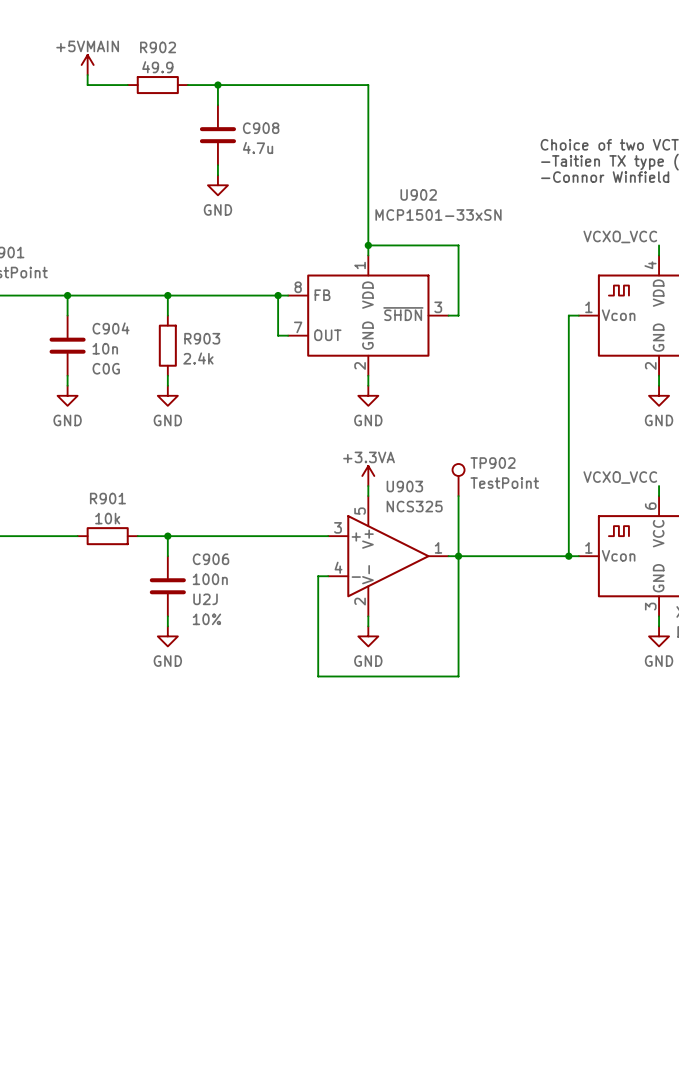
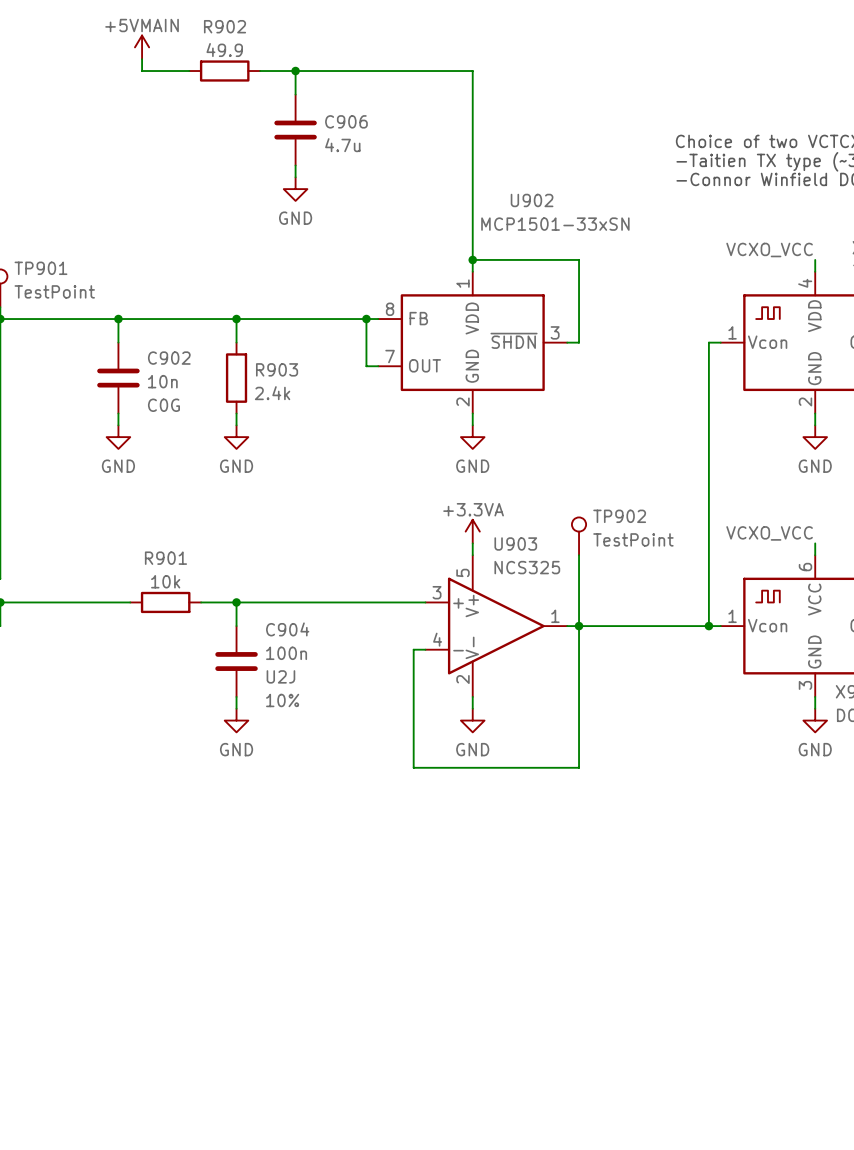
C908 name: C908 (261, 128) -> C906 (346, 121)
C904 name: C904 (111, 328) -> C902 (169, 358)
C906 name: C906 (211, 559) -> C904 (287, 629)

